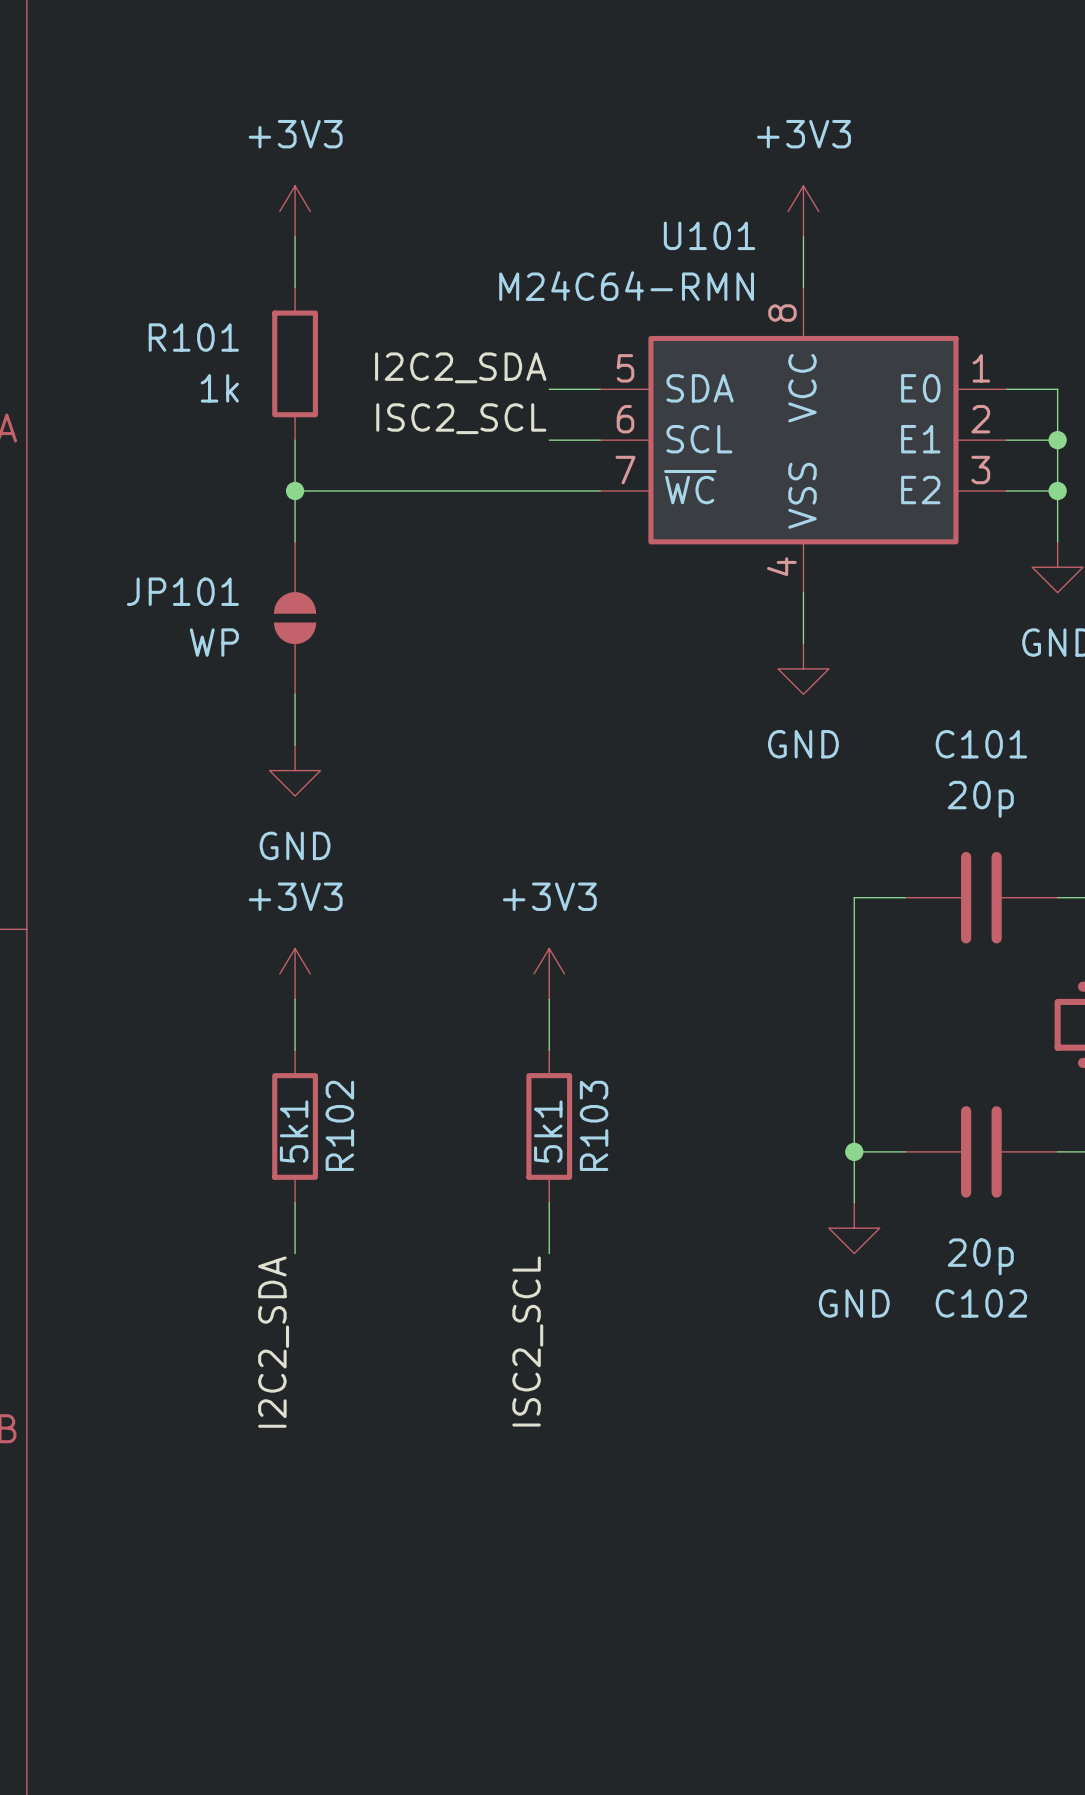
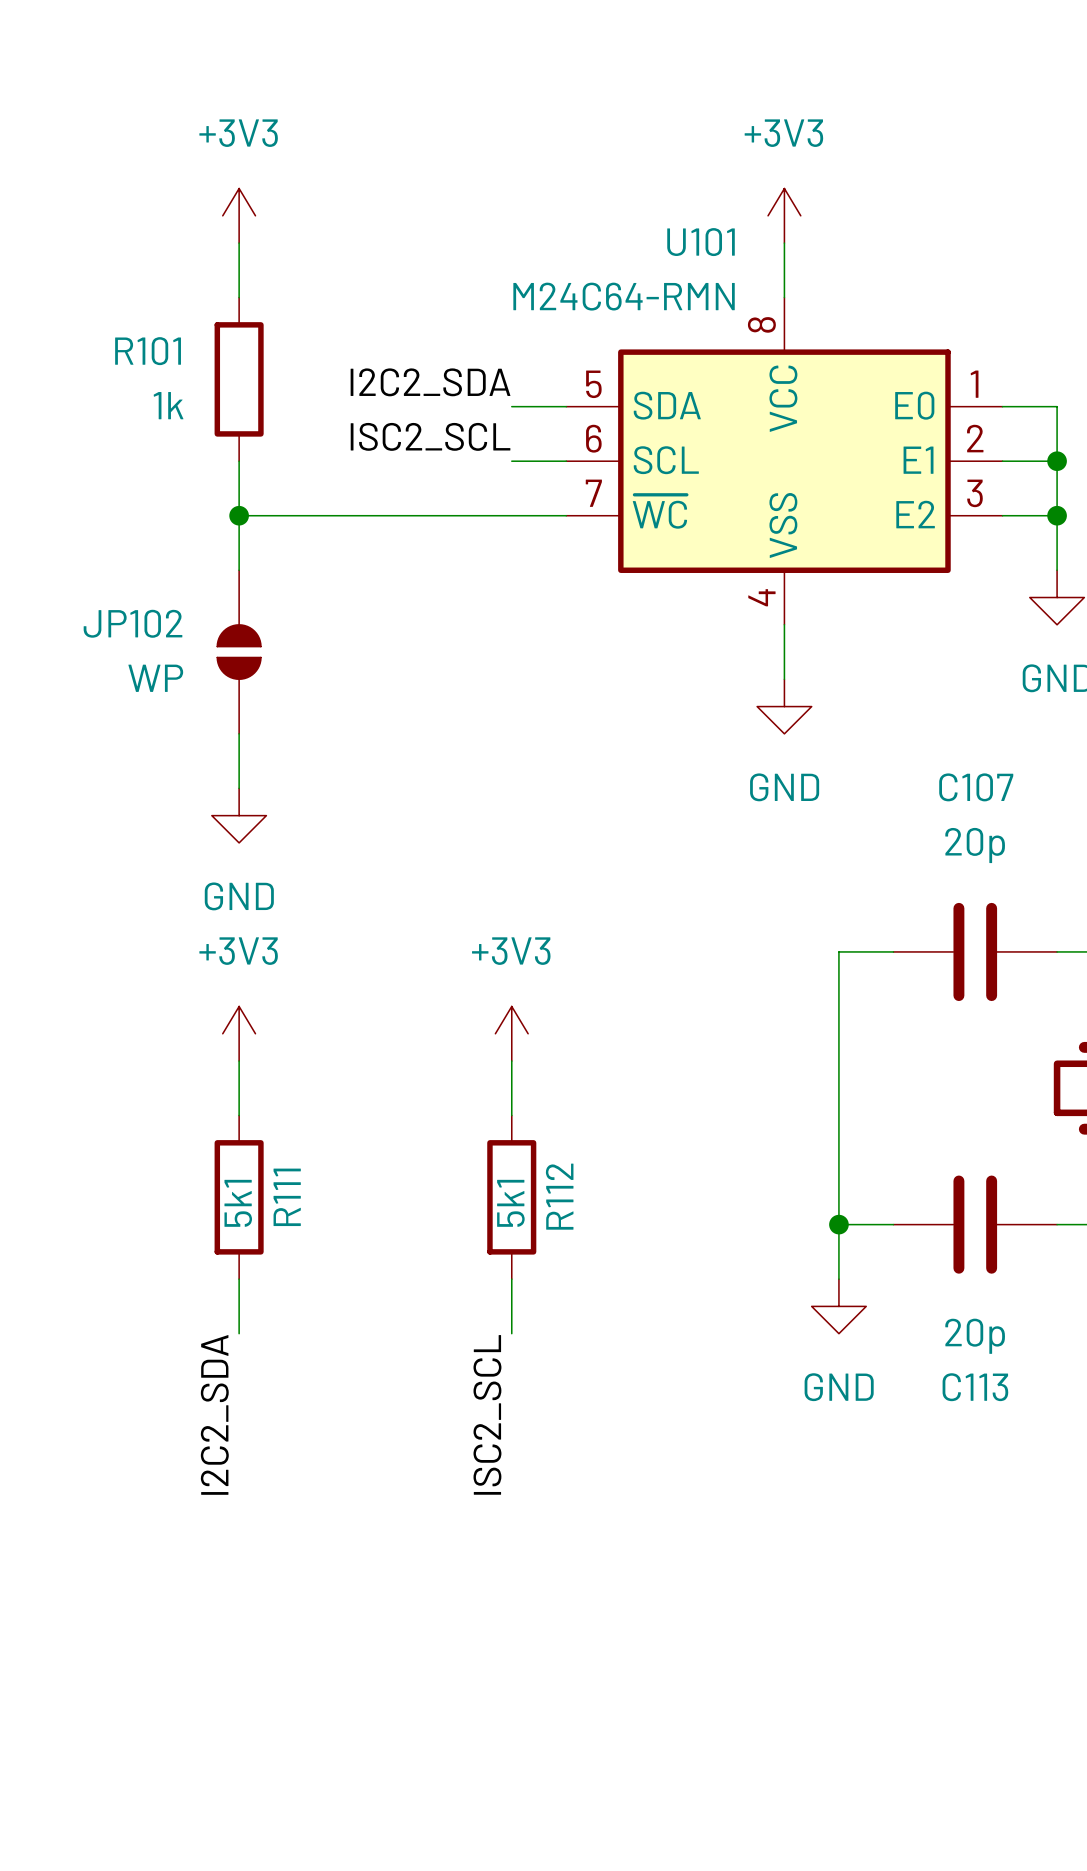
JP101 name: JP101 (182, 591) -> JP102 (133, 623)
C101 name: C101 (981, 744) -> C107 (976, 787)
R102 name: R102 (339, 1125) -> R111 (287, 1197)
R103 name: R103 (594, 1125) -> R112 (559, 1196)
C102 name: C102 (981, 1303) -> C113 (975, 1387)

